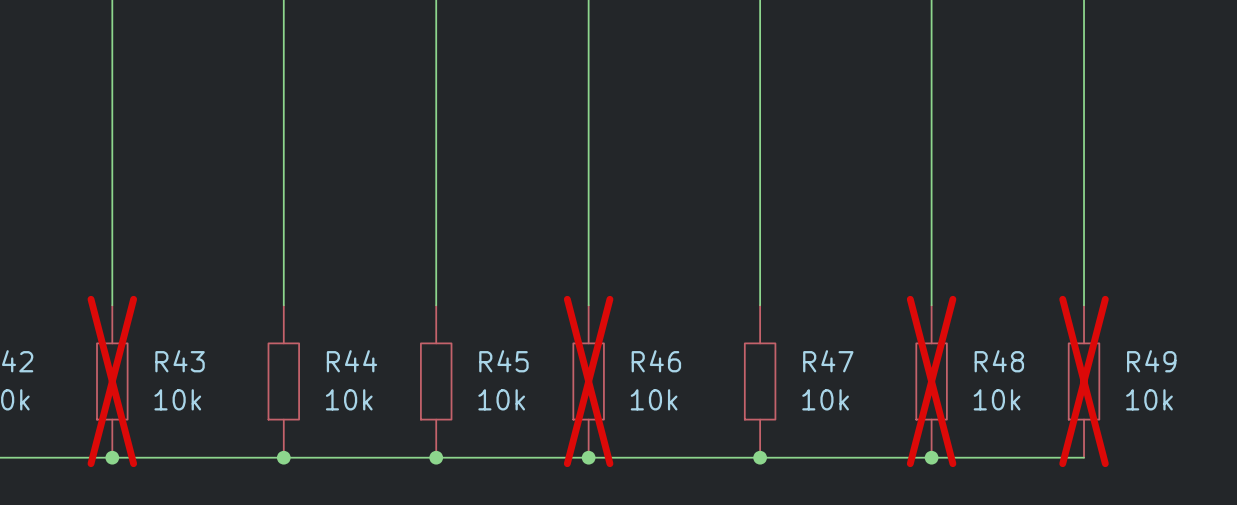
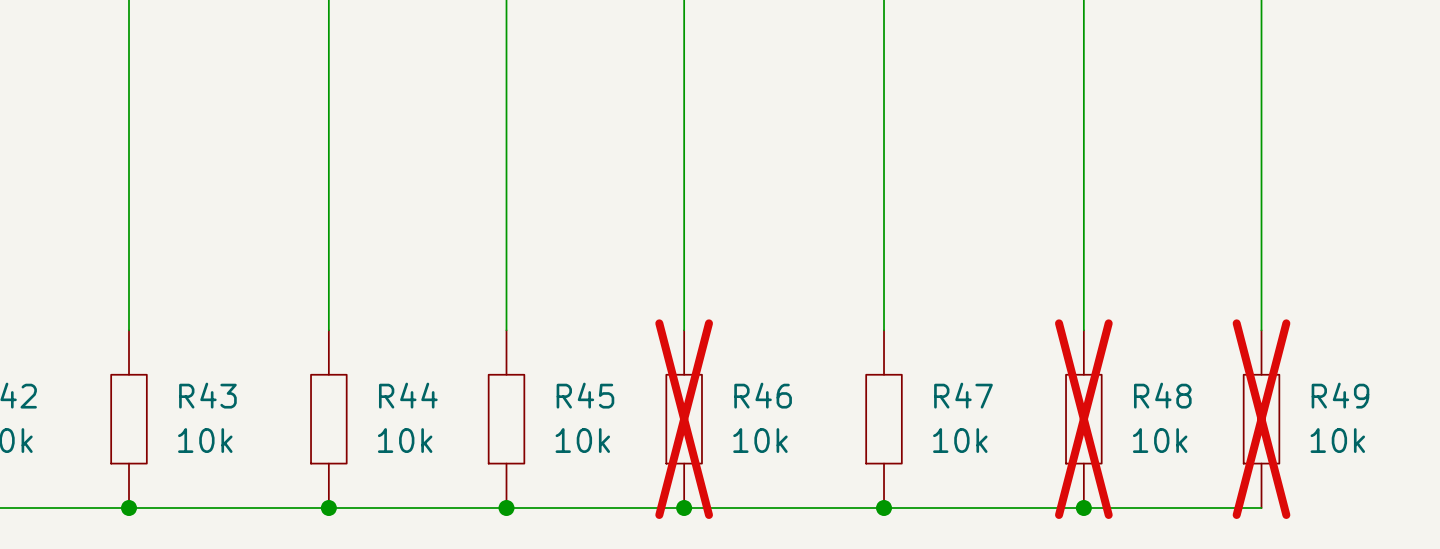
R43 do-not-place cross: (112, 381) -> none

